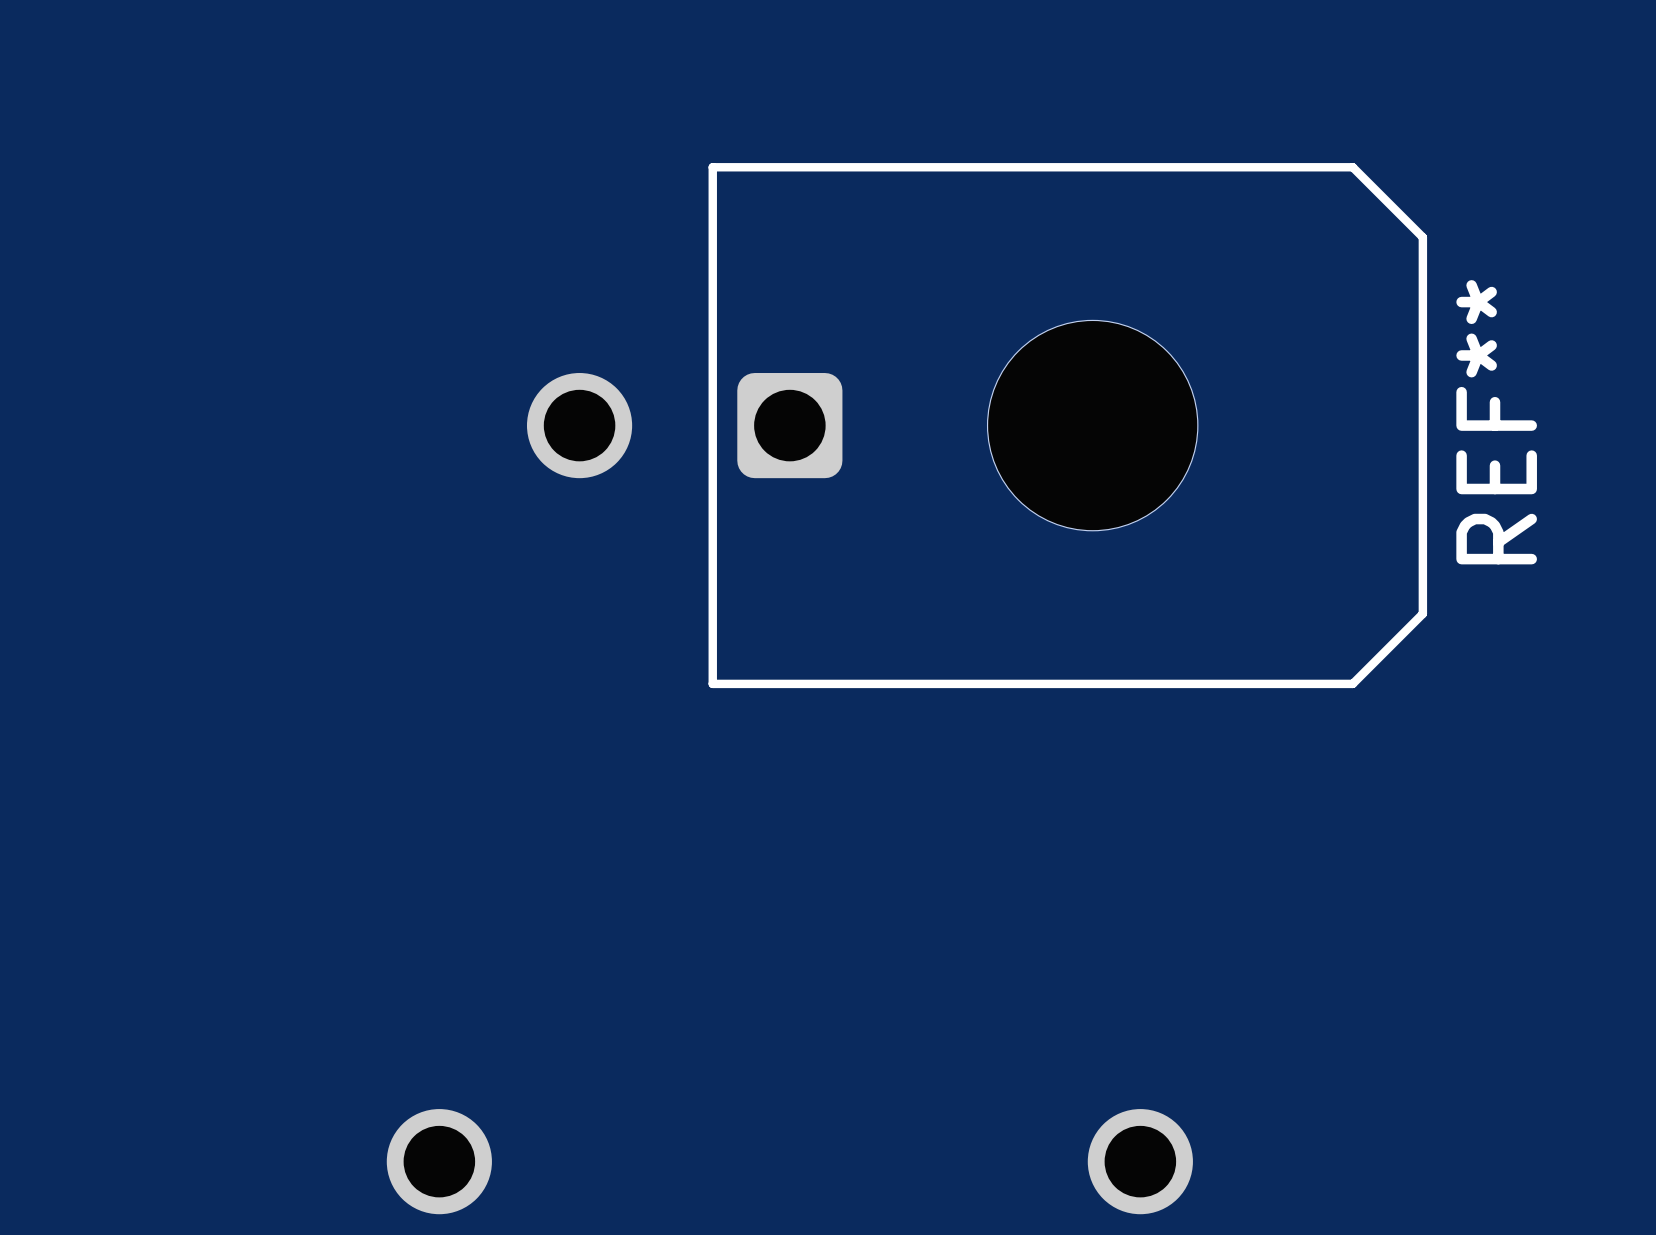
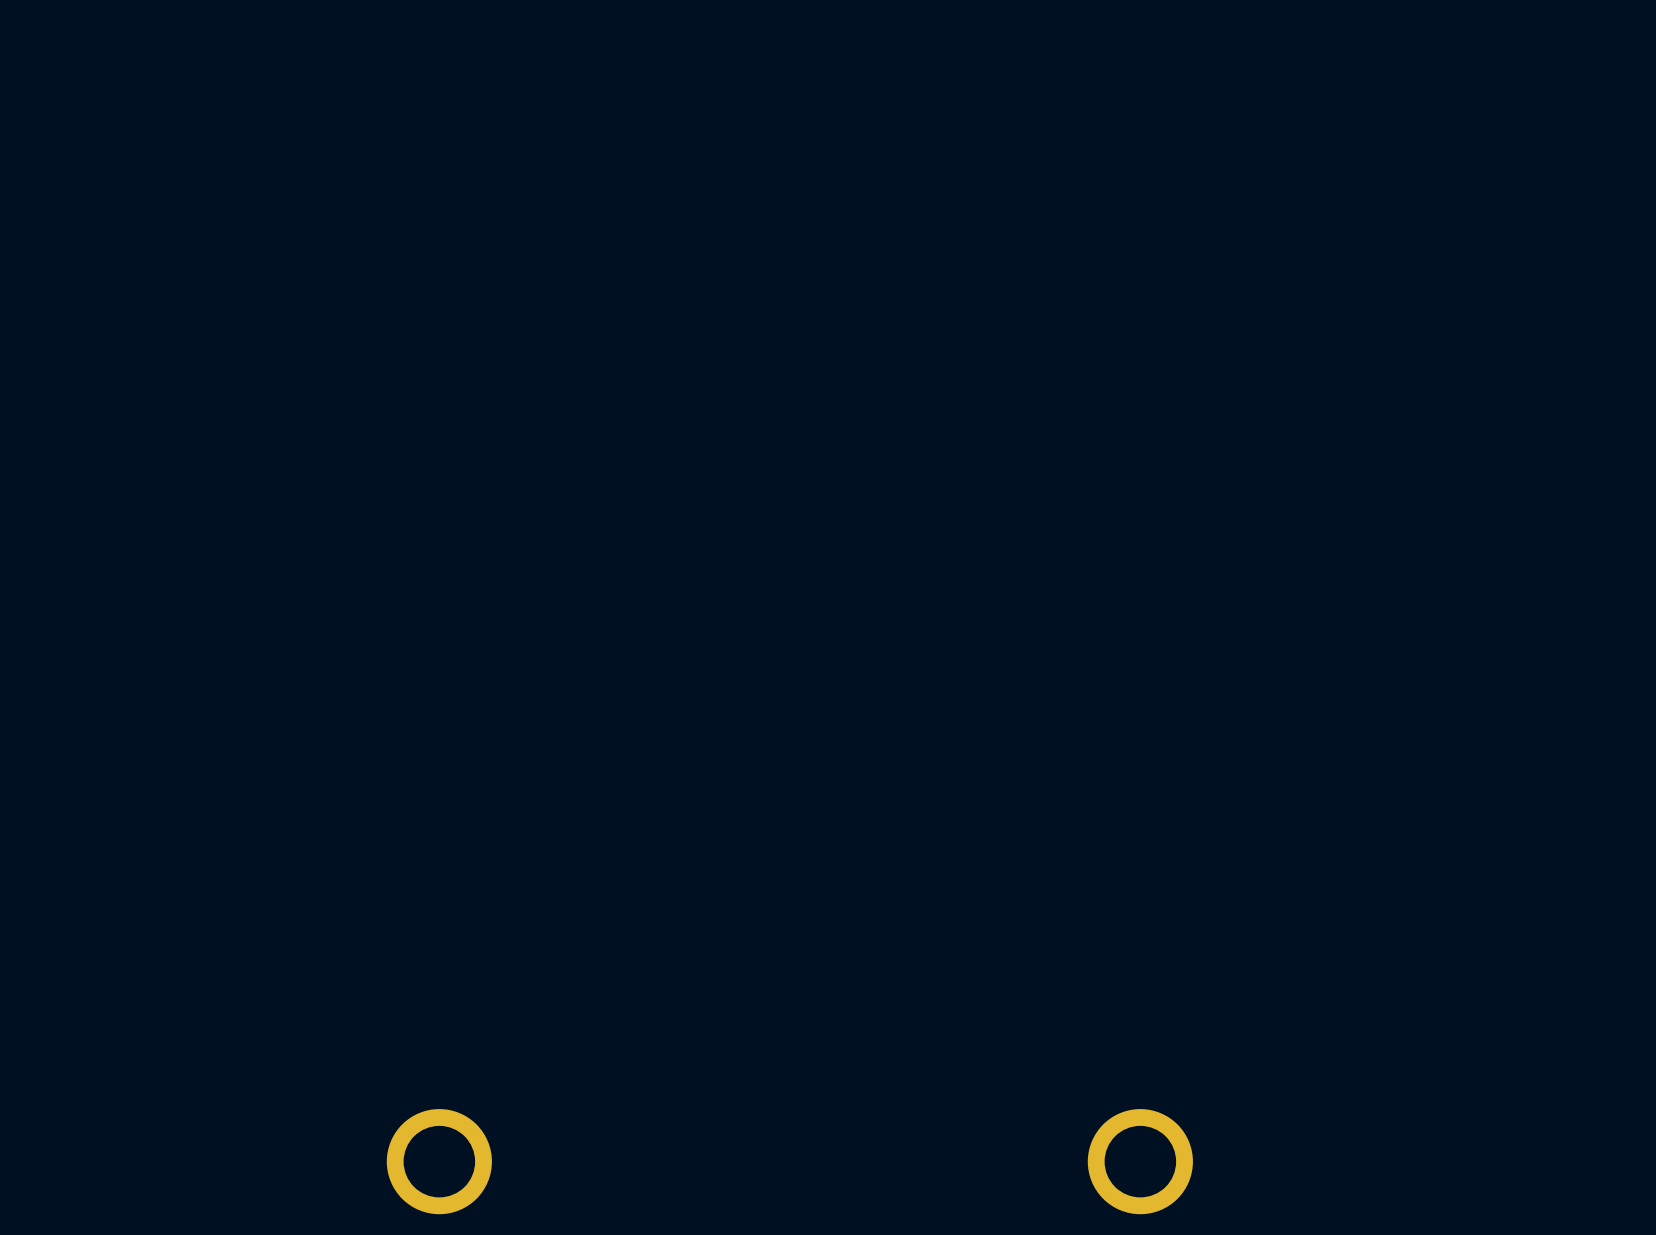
REF**: (977, 425) -> none

